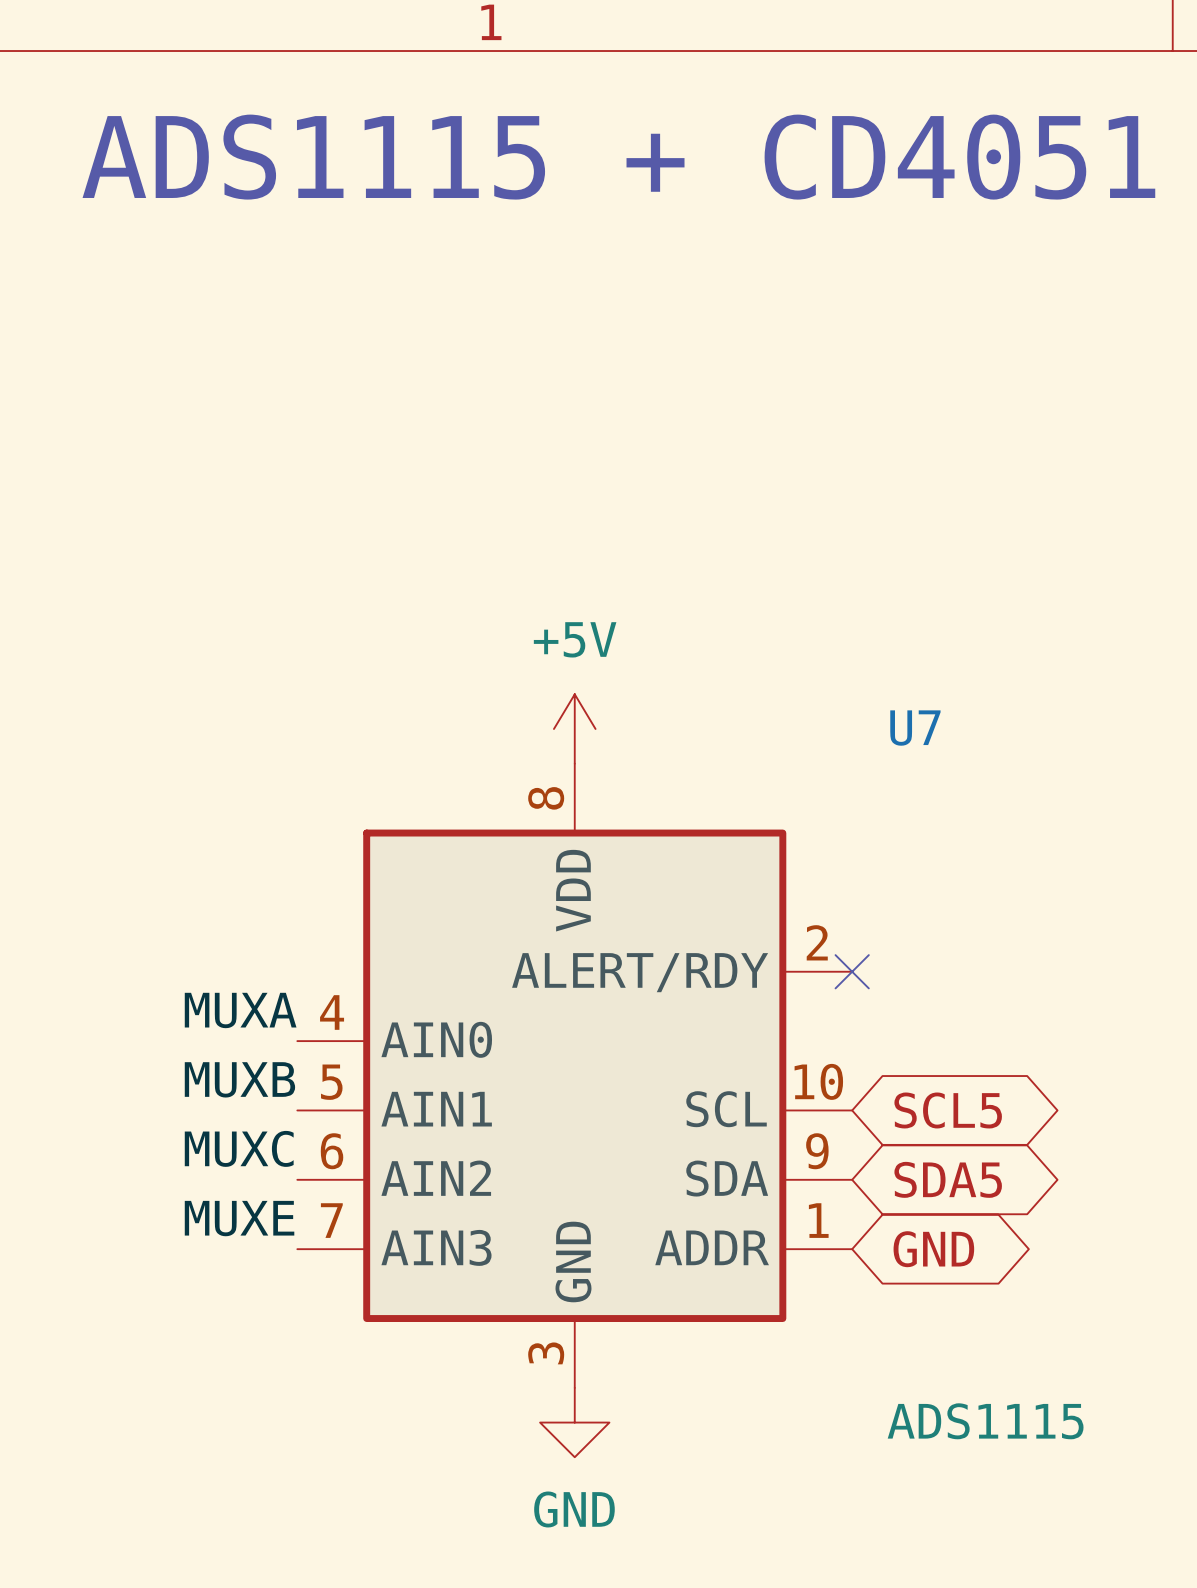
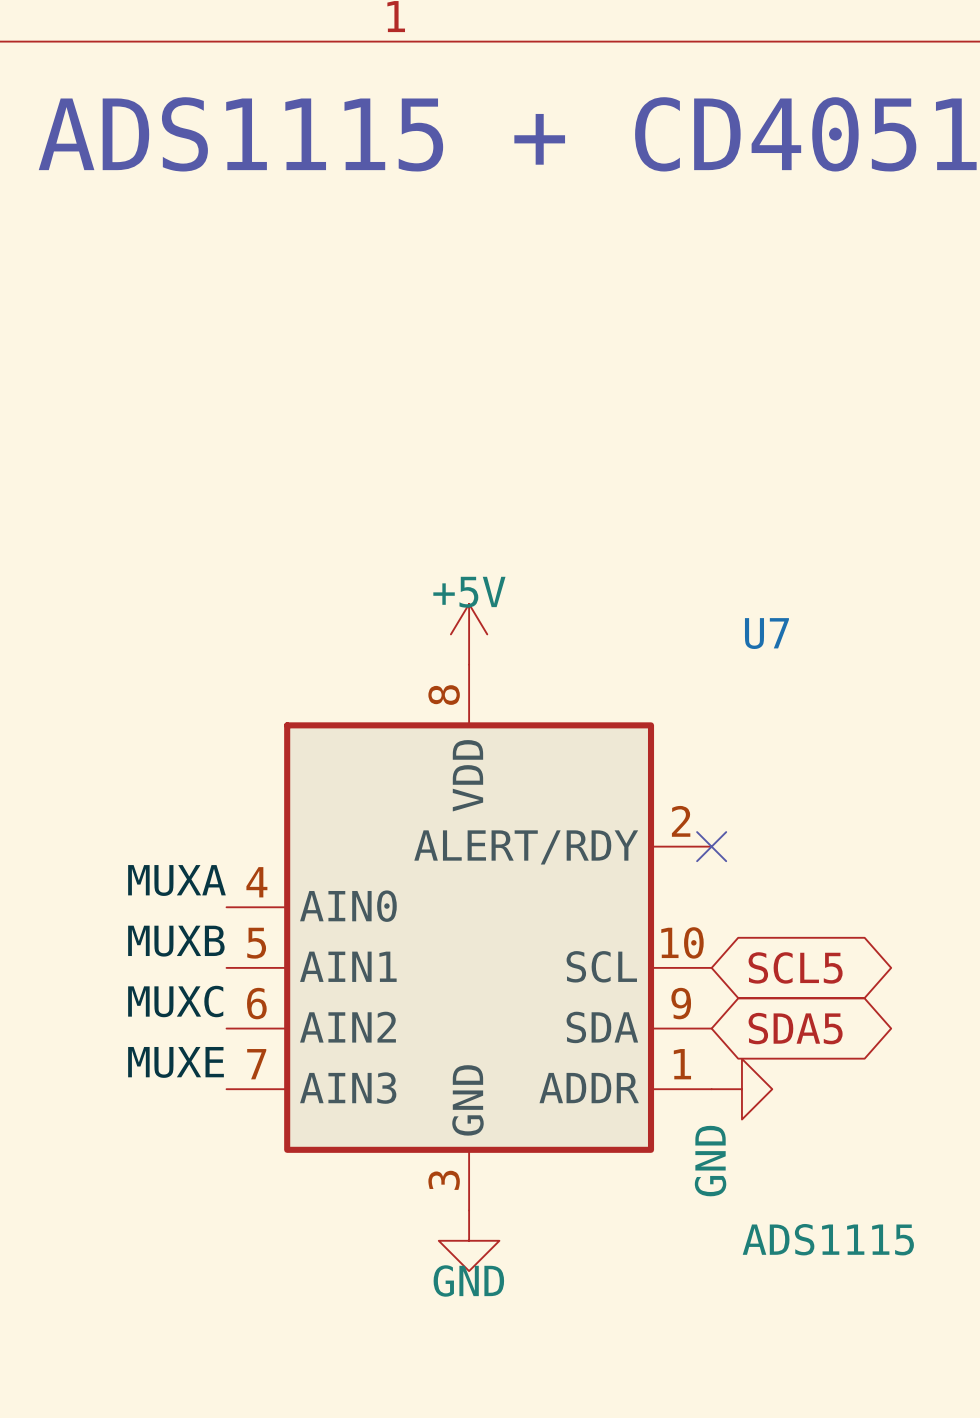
power symbol text position: +5V (575, 639) -> +5V (469, 592)
power symbol: none -> GND (741, 1089)
global label: GND (933, 1249) -> none
power symbol text position: GND (574, 1509) -> GND (468, 1280)

